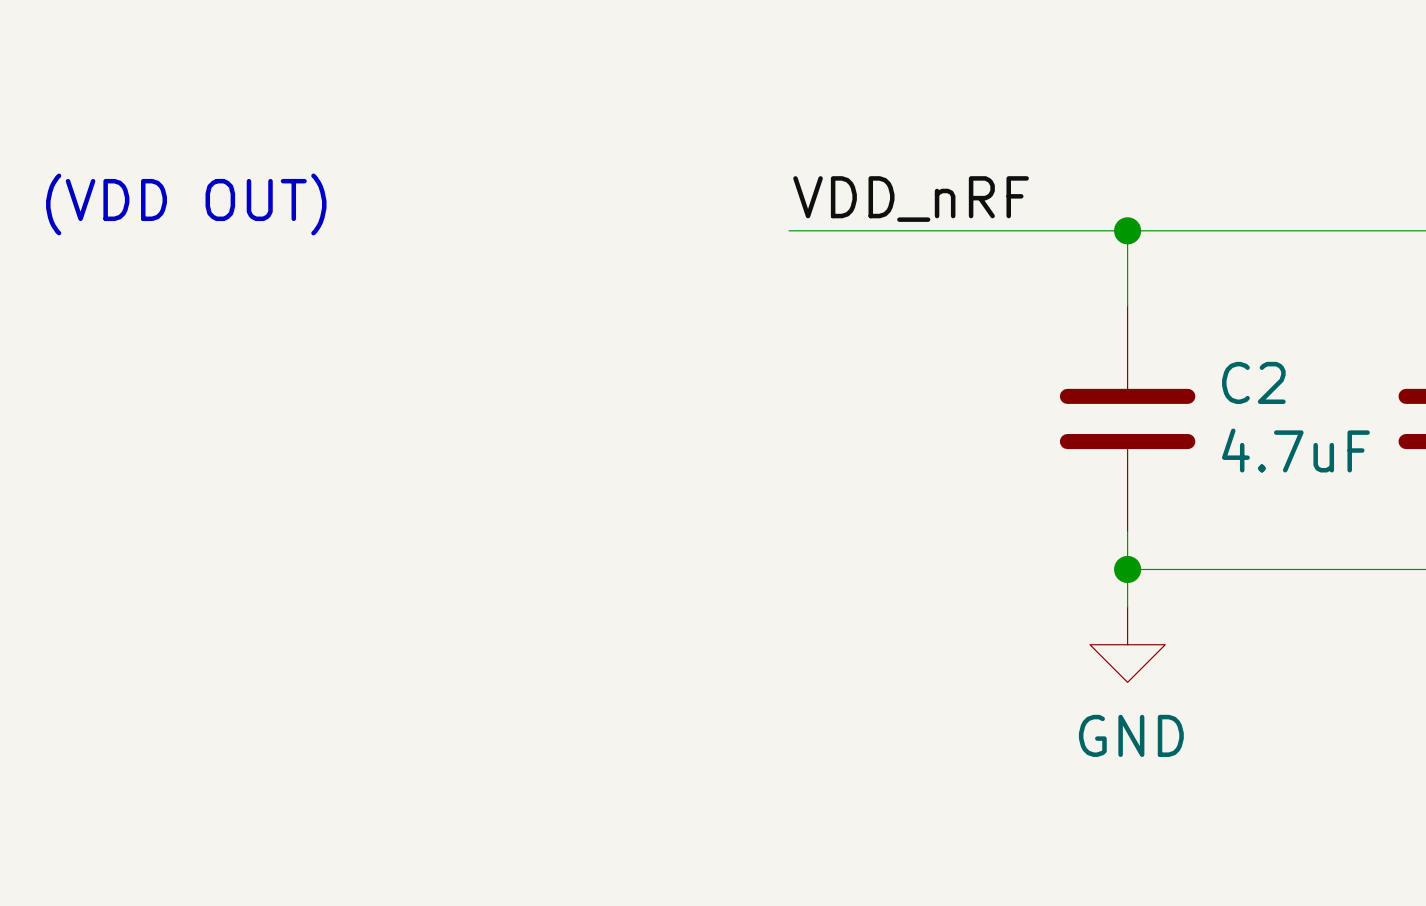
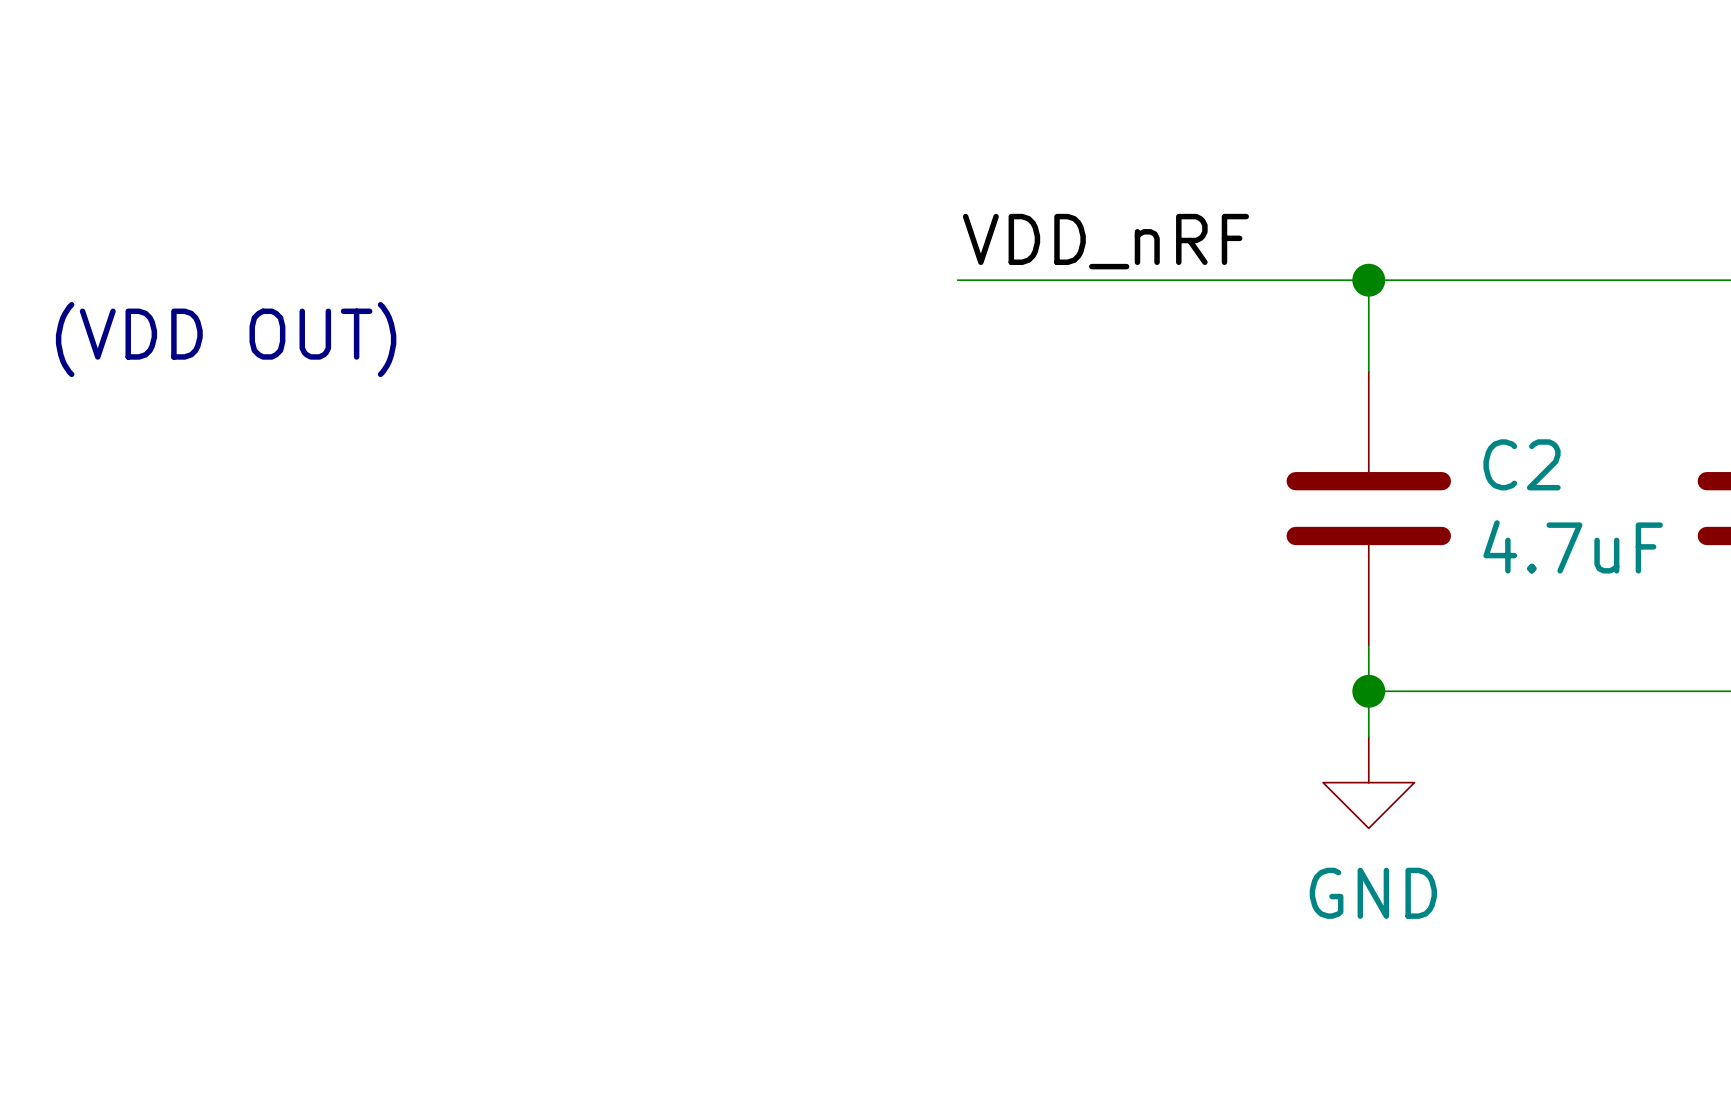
text position: (VDD OUT) (186, 204) -> (VDD OUT) (226, 339)

